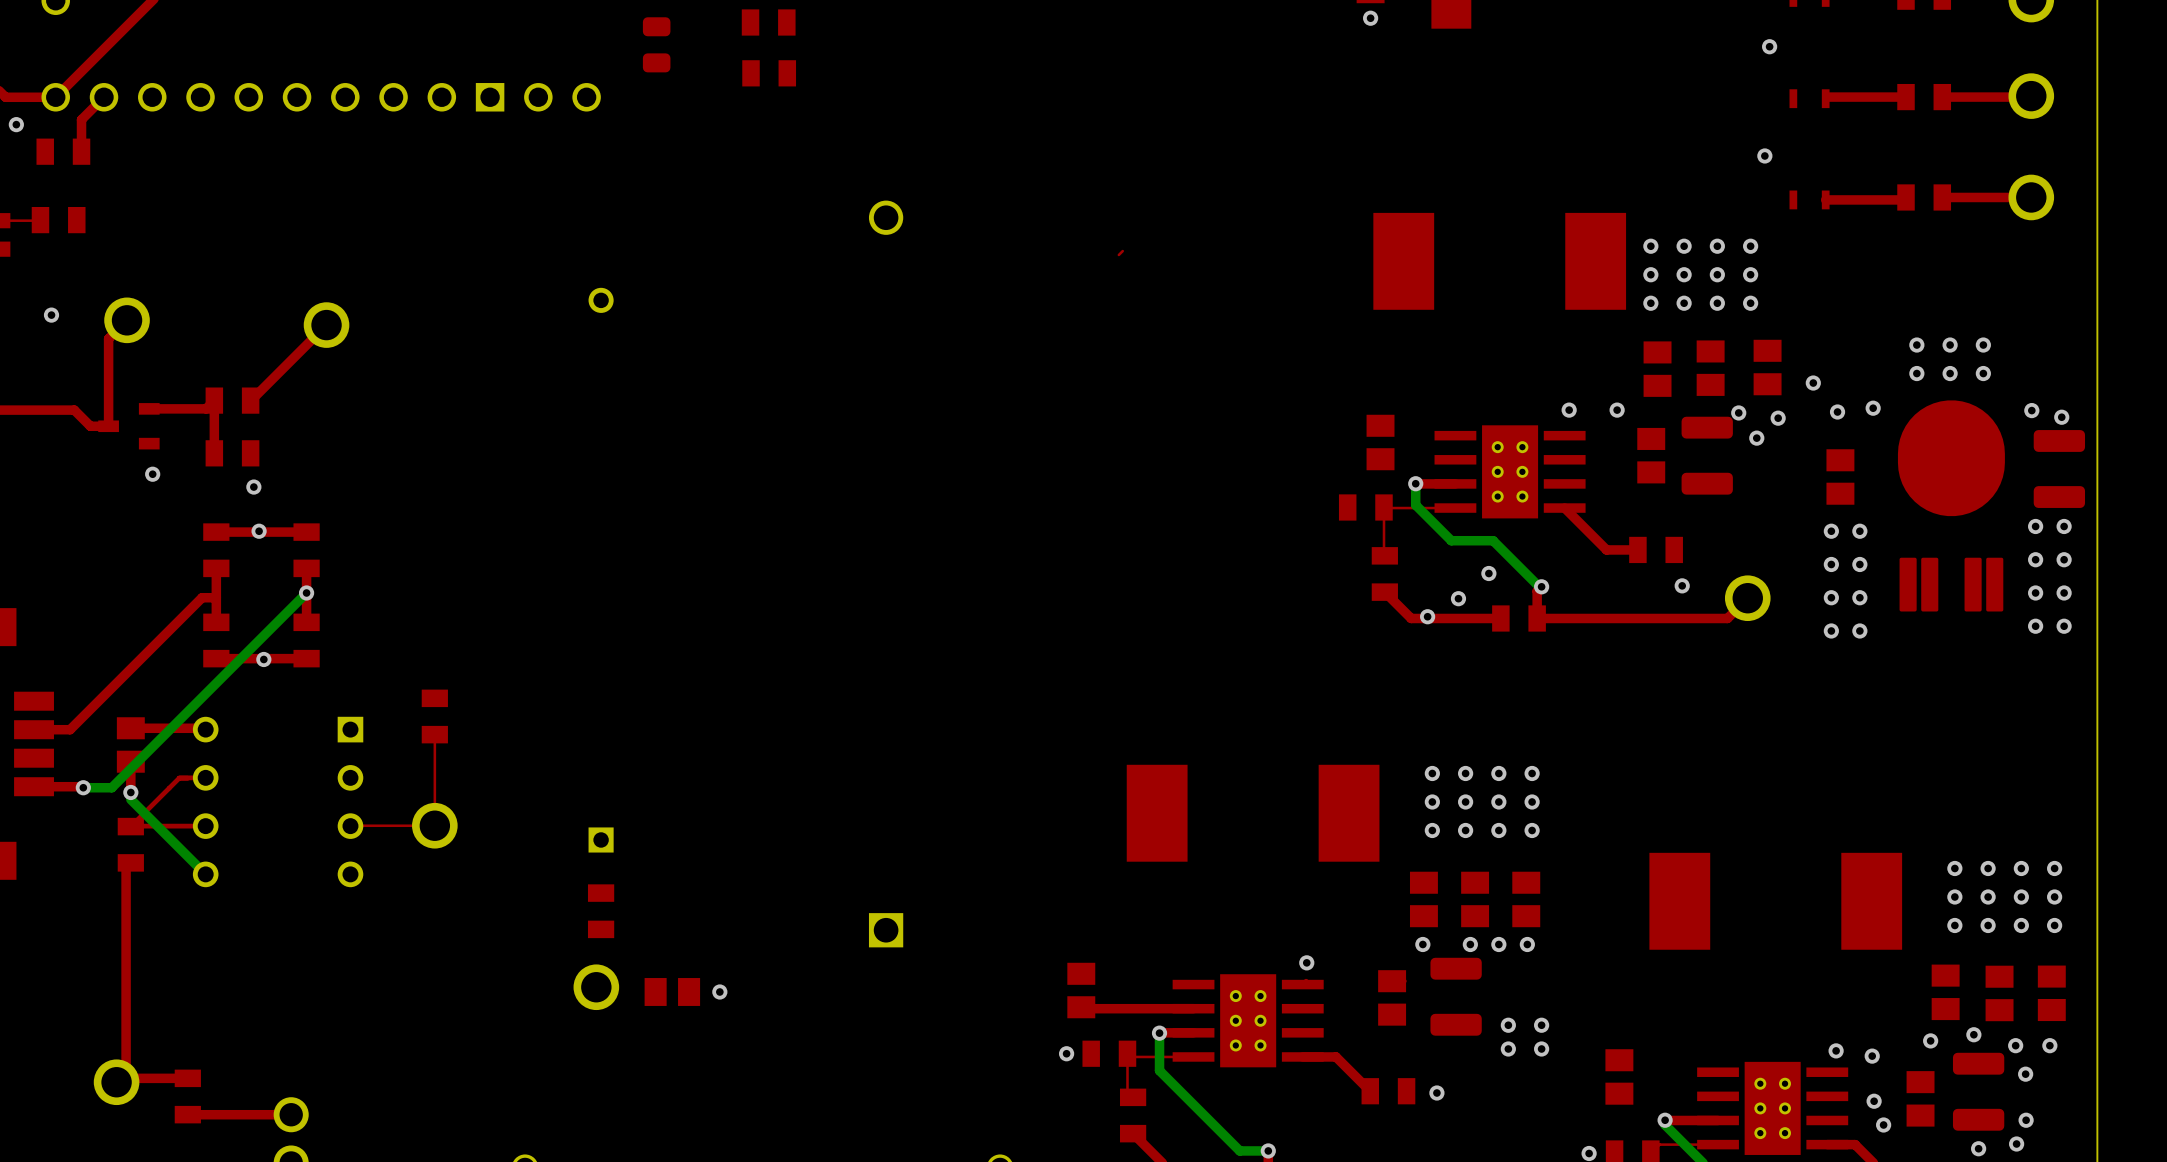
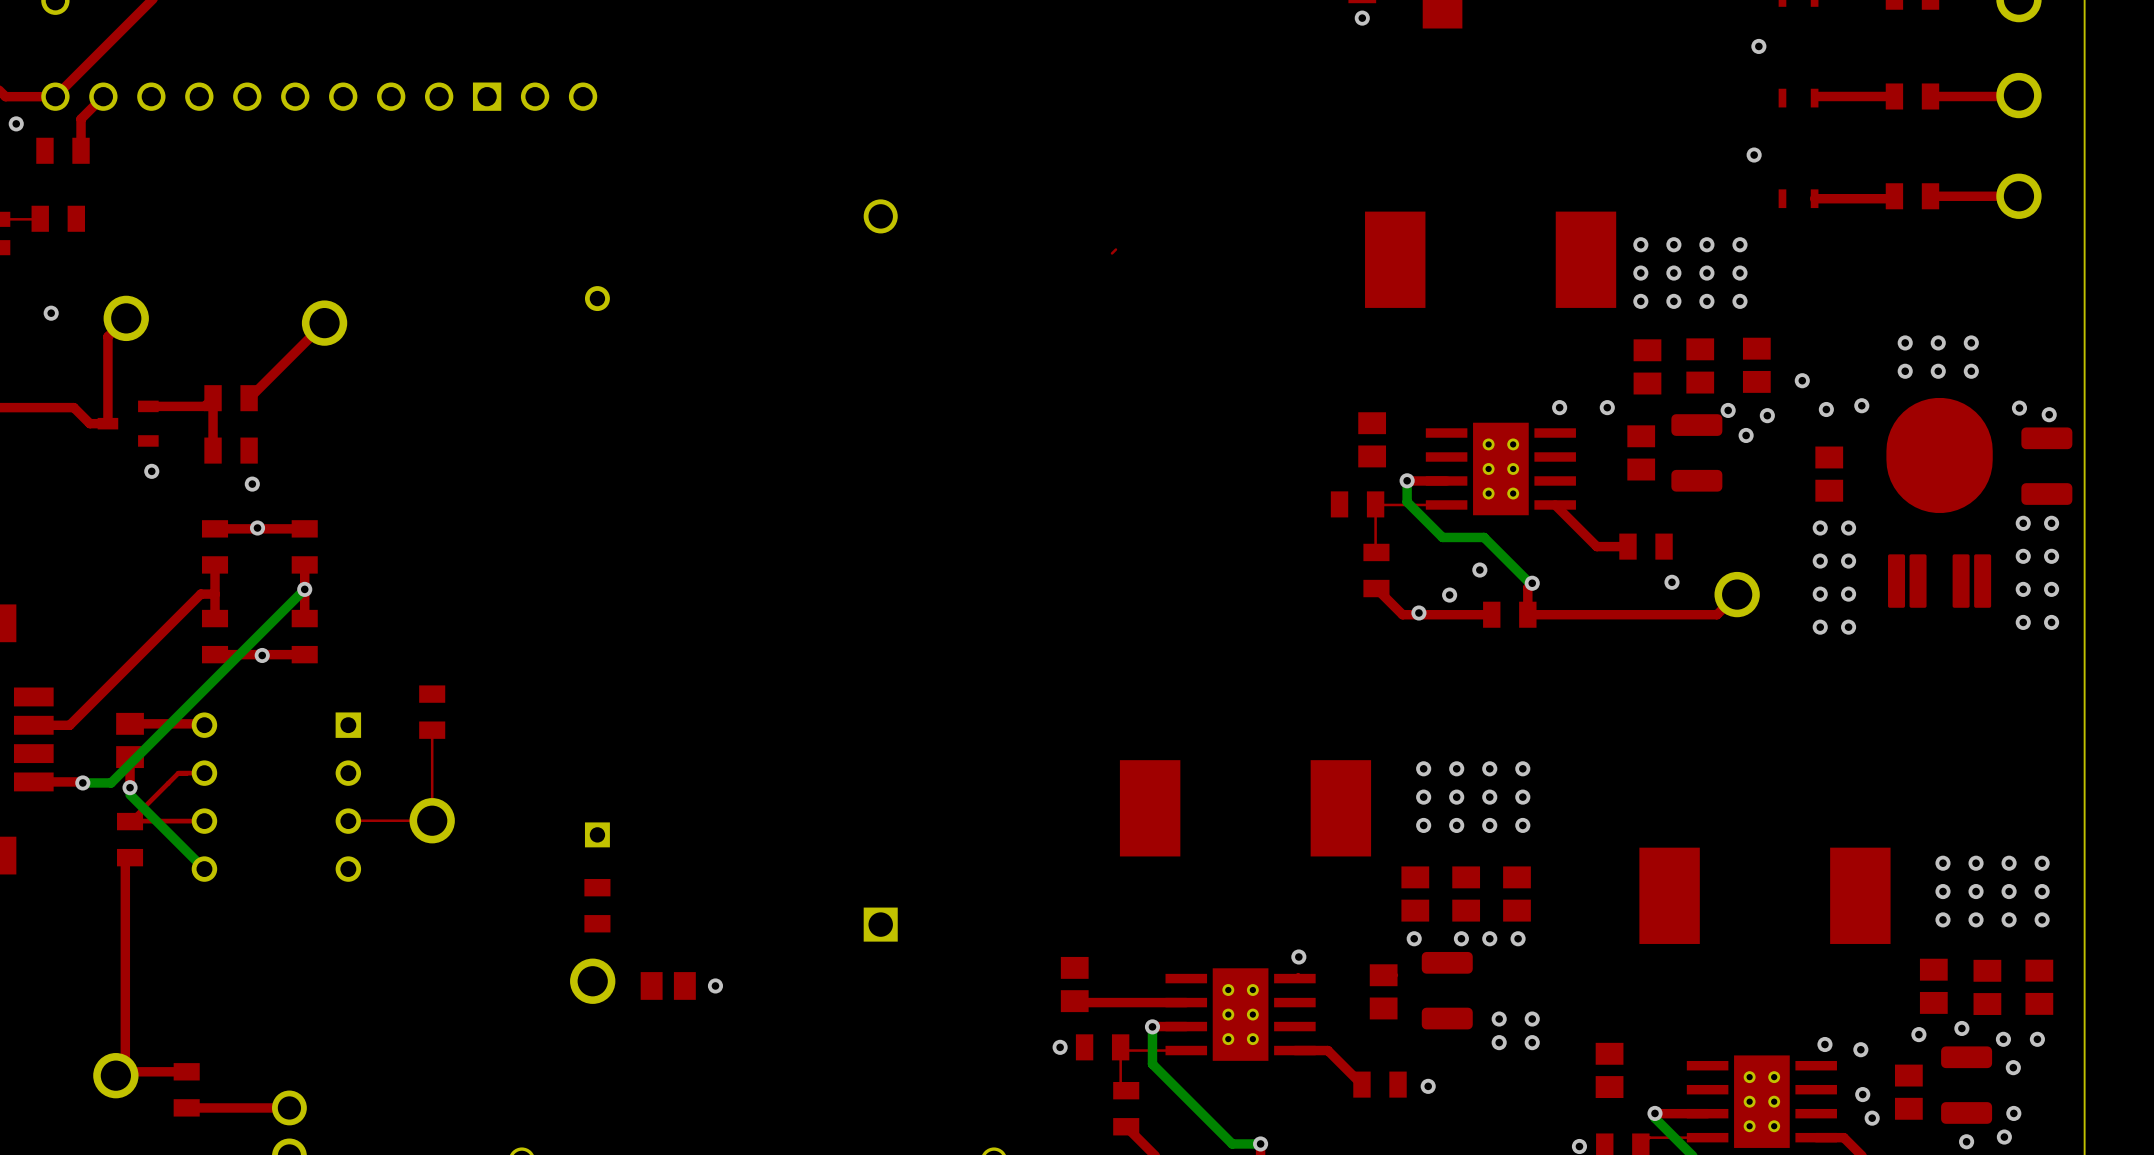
part: (768, 22) -> none
part: (656, 44) -> none
part: (769, 73) -> none

